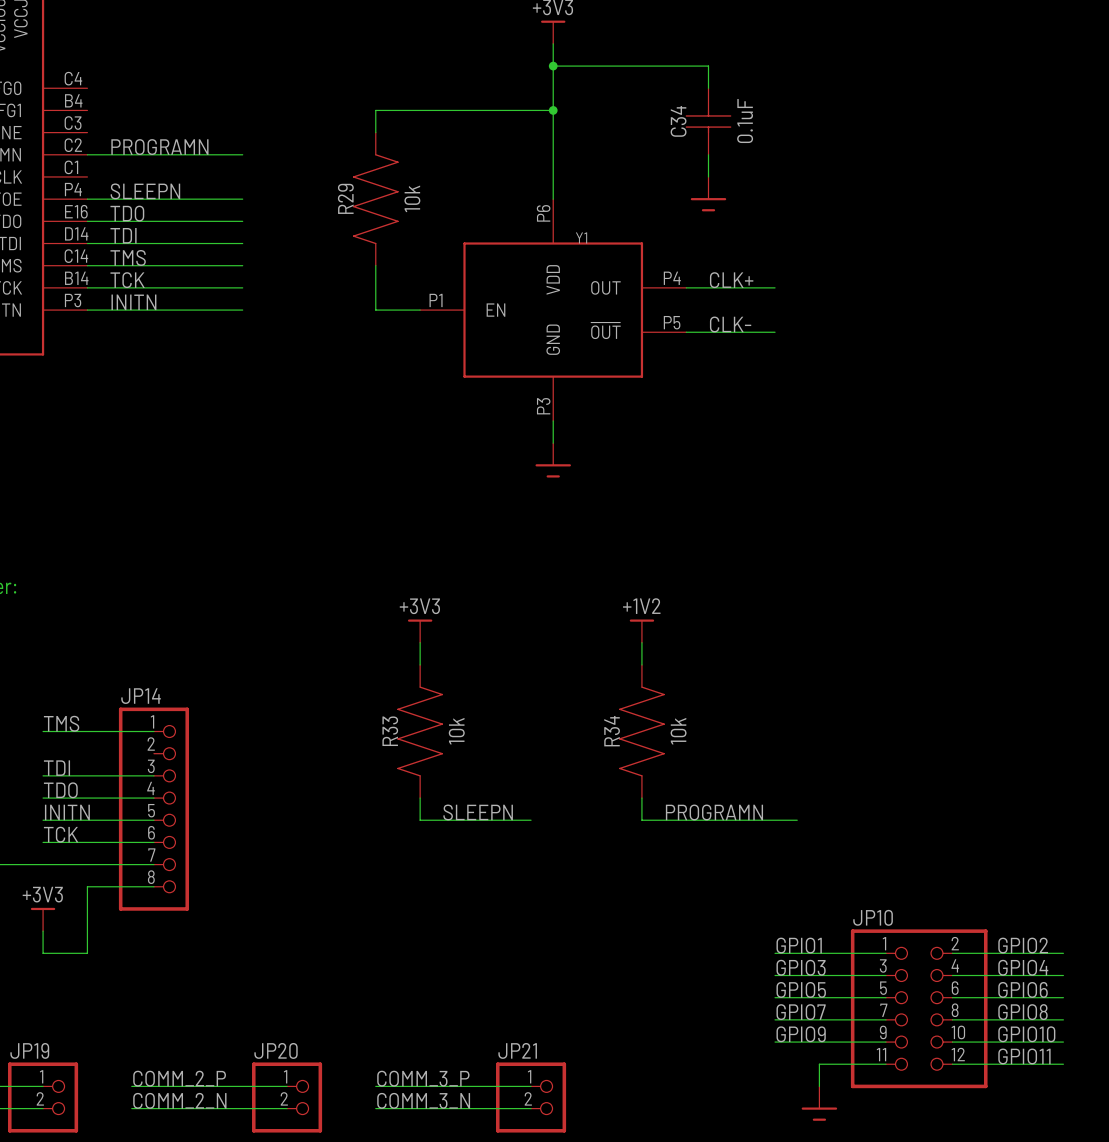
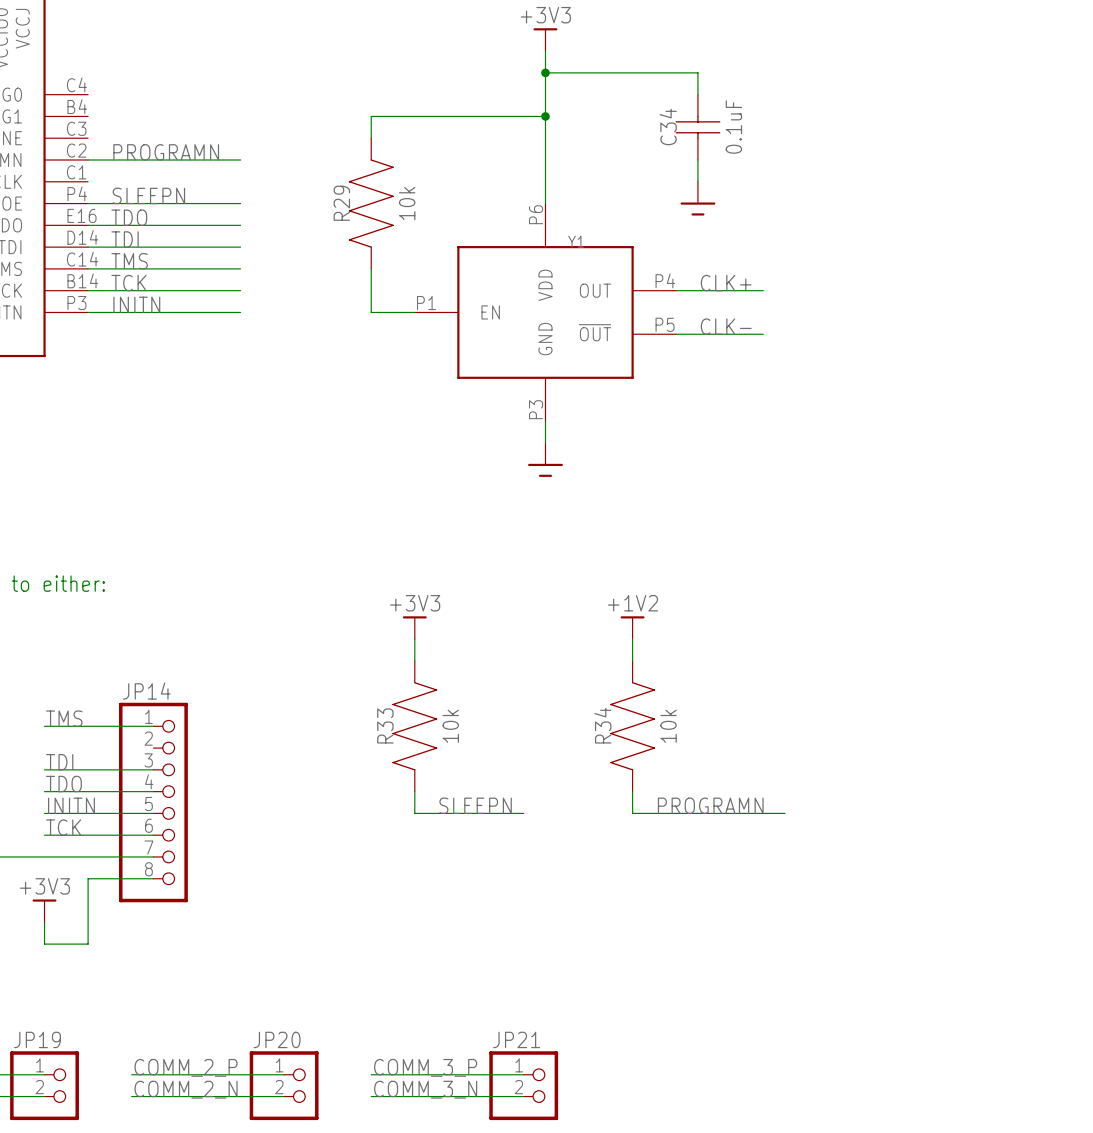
label: GPIO1 (799, 945) -> none
label: GPIO2 (1023, 945) -> none
wire: (775, 953) (885, 953) -> none
wire: (952, 953) (1063, 953) -> none
label: GPIO3 (801, 967) -> none
label: GPIO4 (1023, 967) -> none
wire: (775, 975) (885, 975) -> none
wire: (952, 975) (1063, 975) -> none
label: GPIO5 (801, 989) -> none
label: GPIO6 (1023, 989) -> none
wire: (775, 997) (885, 997) -> none
wire: (952, 997) (1063, 997) -> none
JP10: (919, 1008) -> none
label: GPIO7 (801, 1012) -> none
label: GPIO8 (1022, 1012) -> none
wire: (775, 1019) (885, 1019) -> none
wire: (952, 1019) (1063, 1019) -> none
label: GPIO9 (801, 1034) -> none
label: GPIO10 (1026, 1034) -> none
wire: (775, 1042) (885, 1042) -> none
wire: (952, 1042) (1063, 1042) -> none
label: GPIO11 (1024, 1056) -> none
wire: (885, 1064) (819, 1064) (819, 1086) -> none
wire: (952, 1064) (1063, 1064) -> none
power symbol: (819, 1103) -> none

